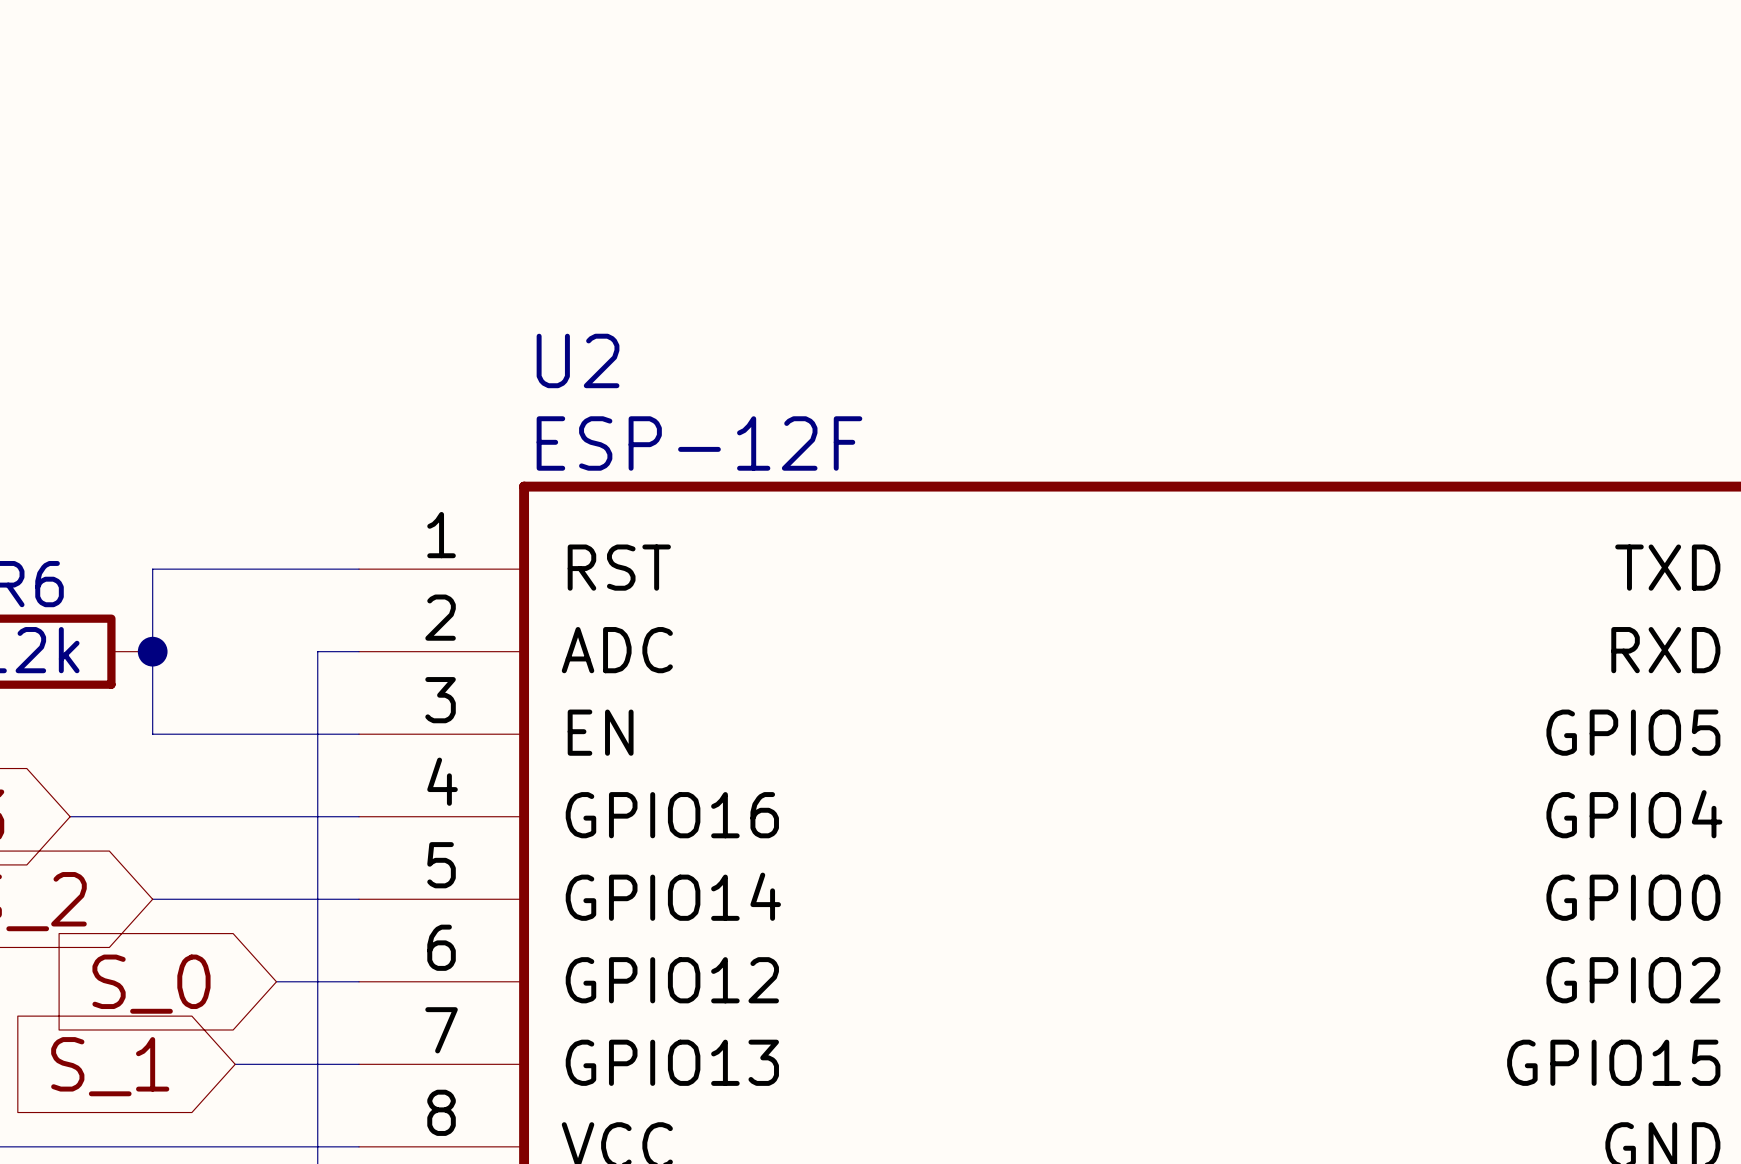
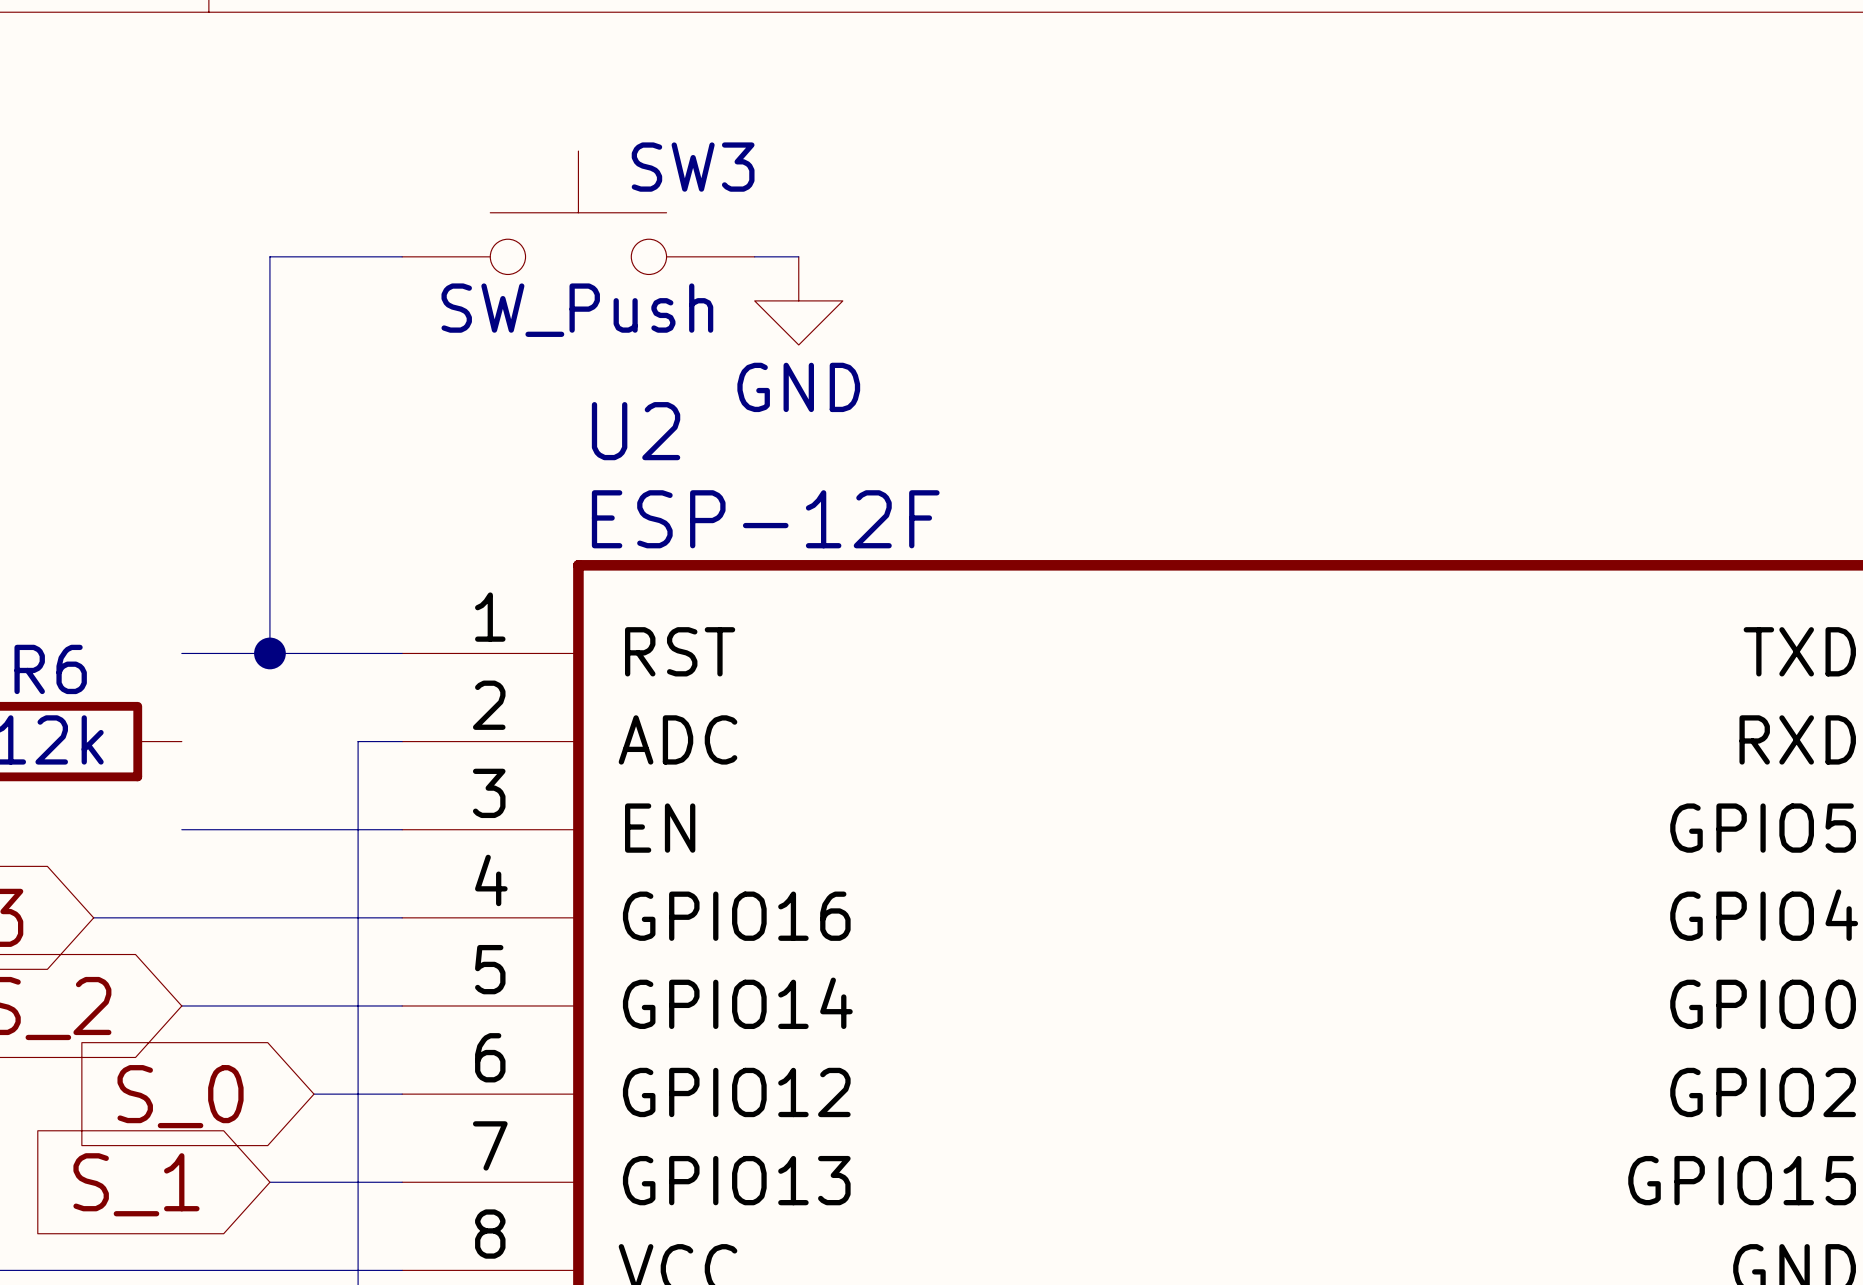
SW3: none -> SW_Push (578, 212)
wire: none -> (402, 256) (269, 256) (269, 653)
wire: none -> (754, 256) (798, 256)
power symbol: none -> GND (798, 300)
wire: (152, 569) (152, 734) -> none
junction position: (152, 651) -> (269, 653)

